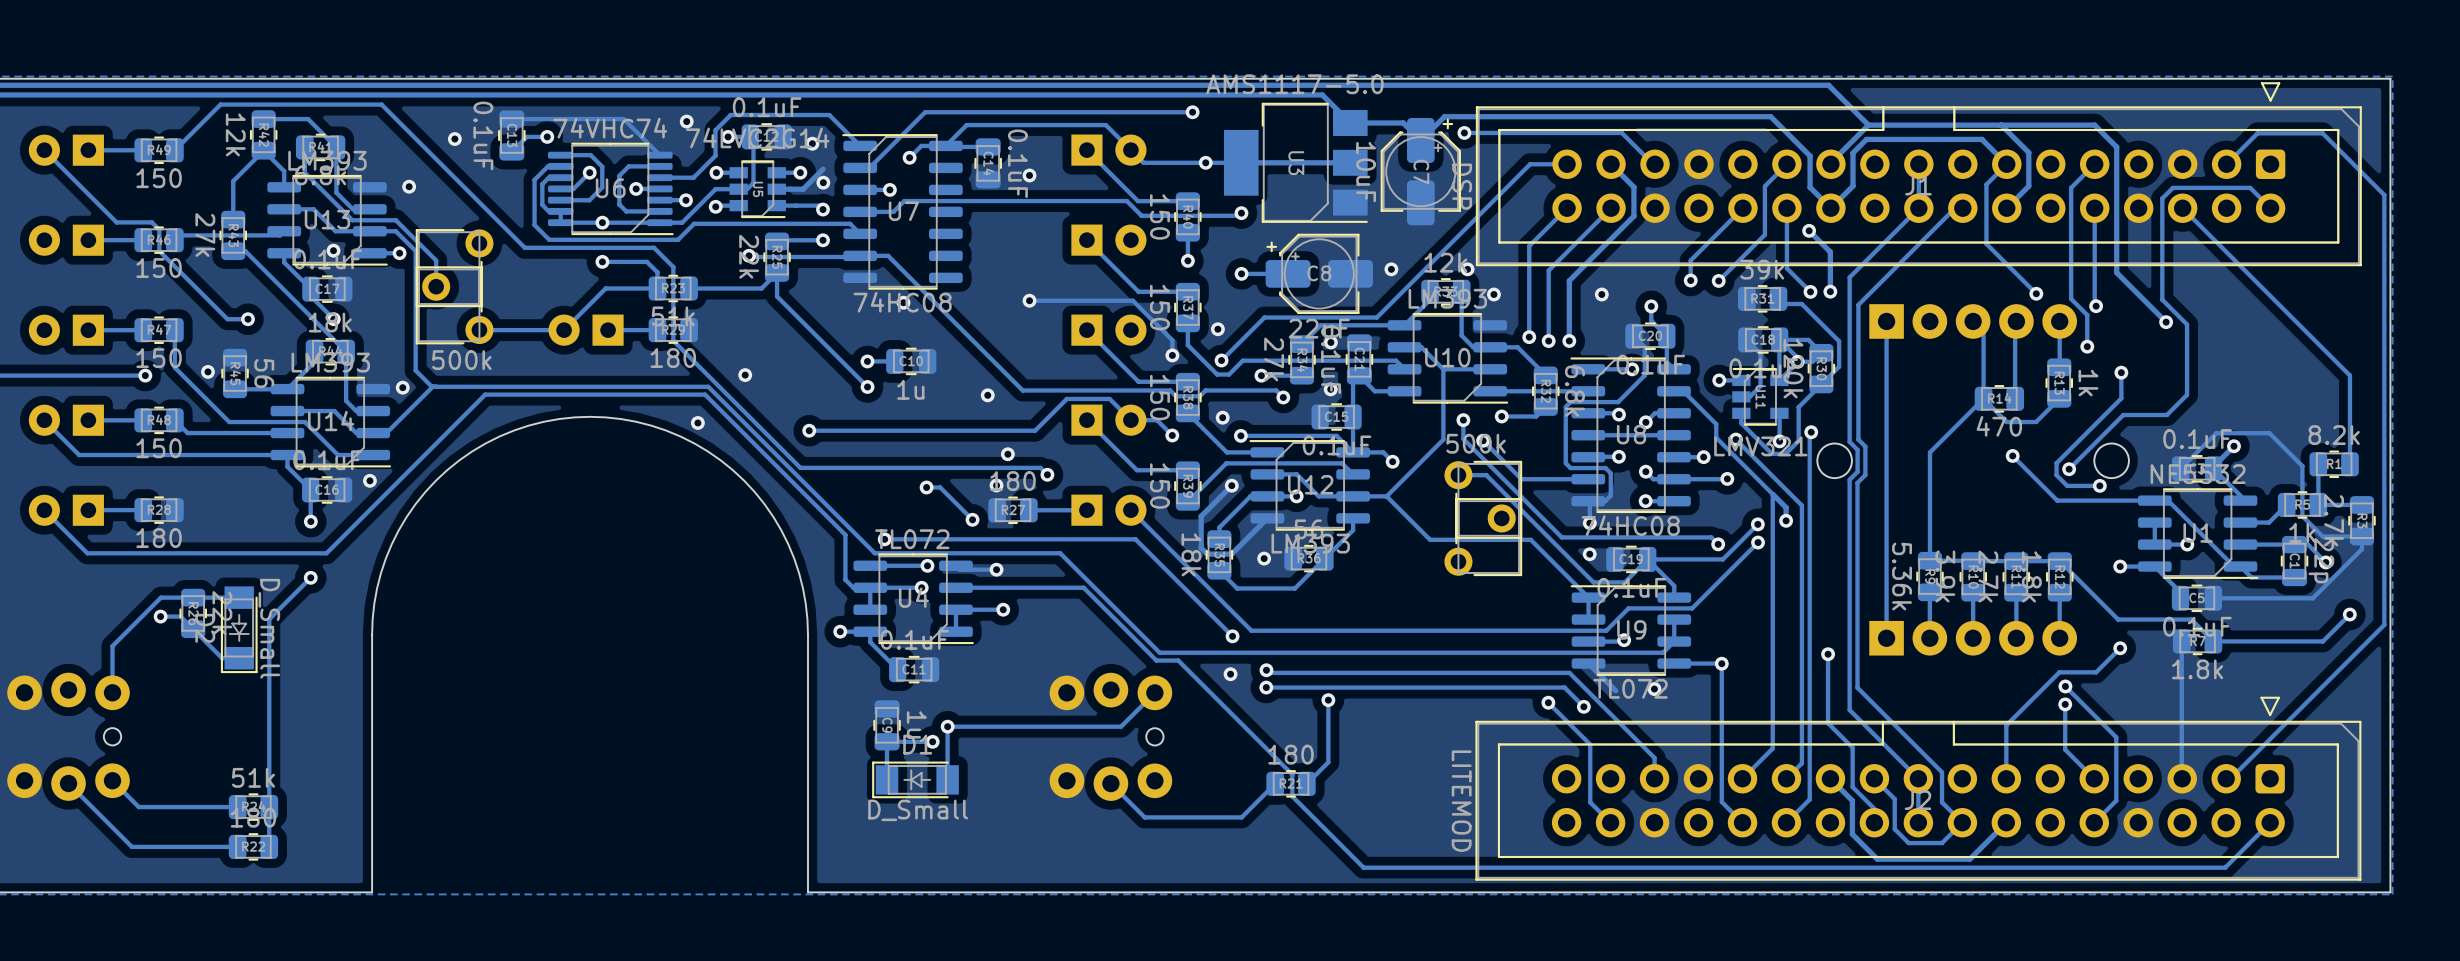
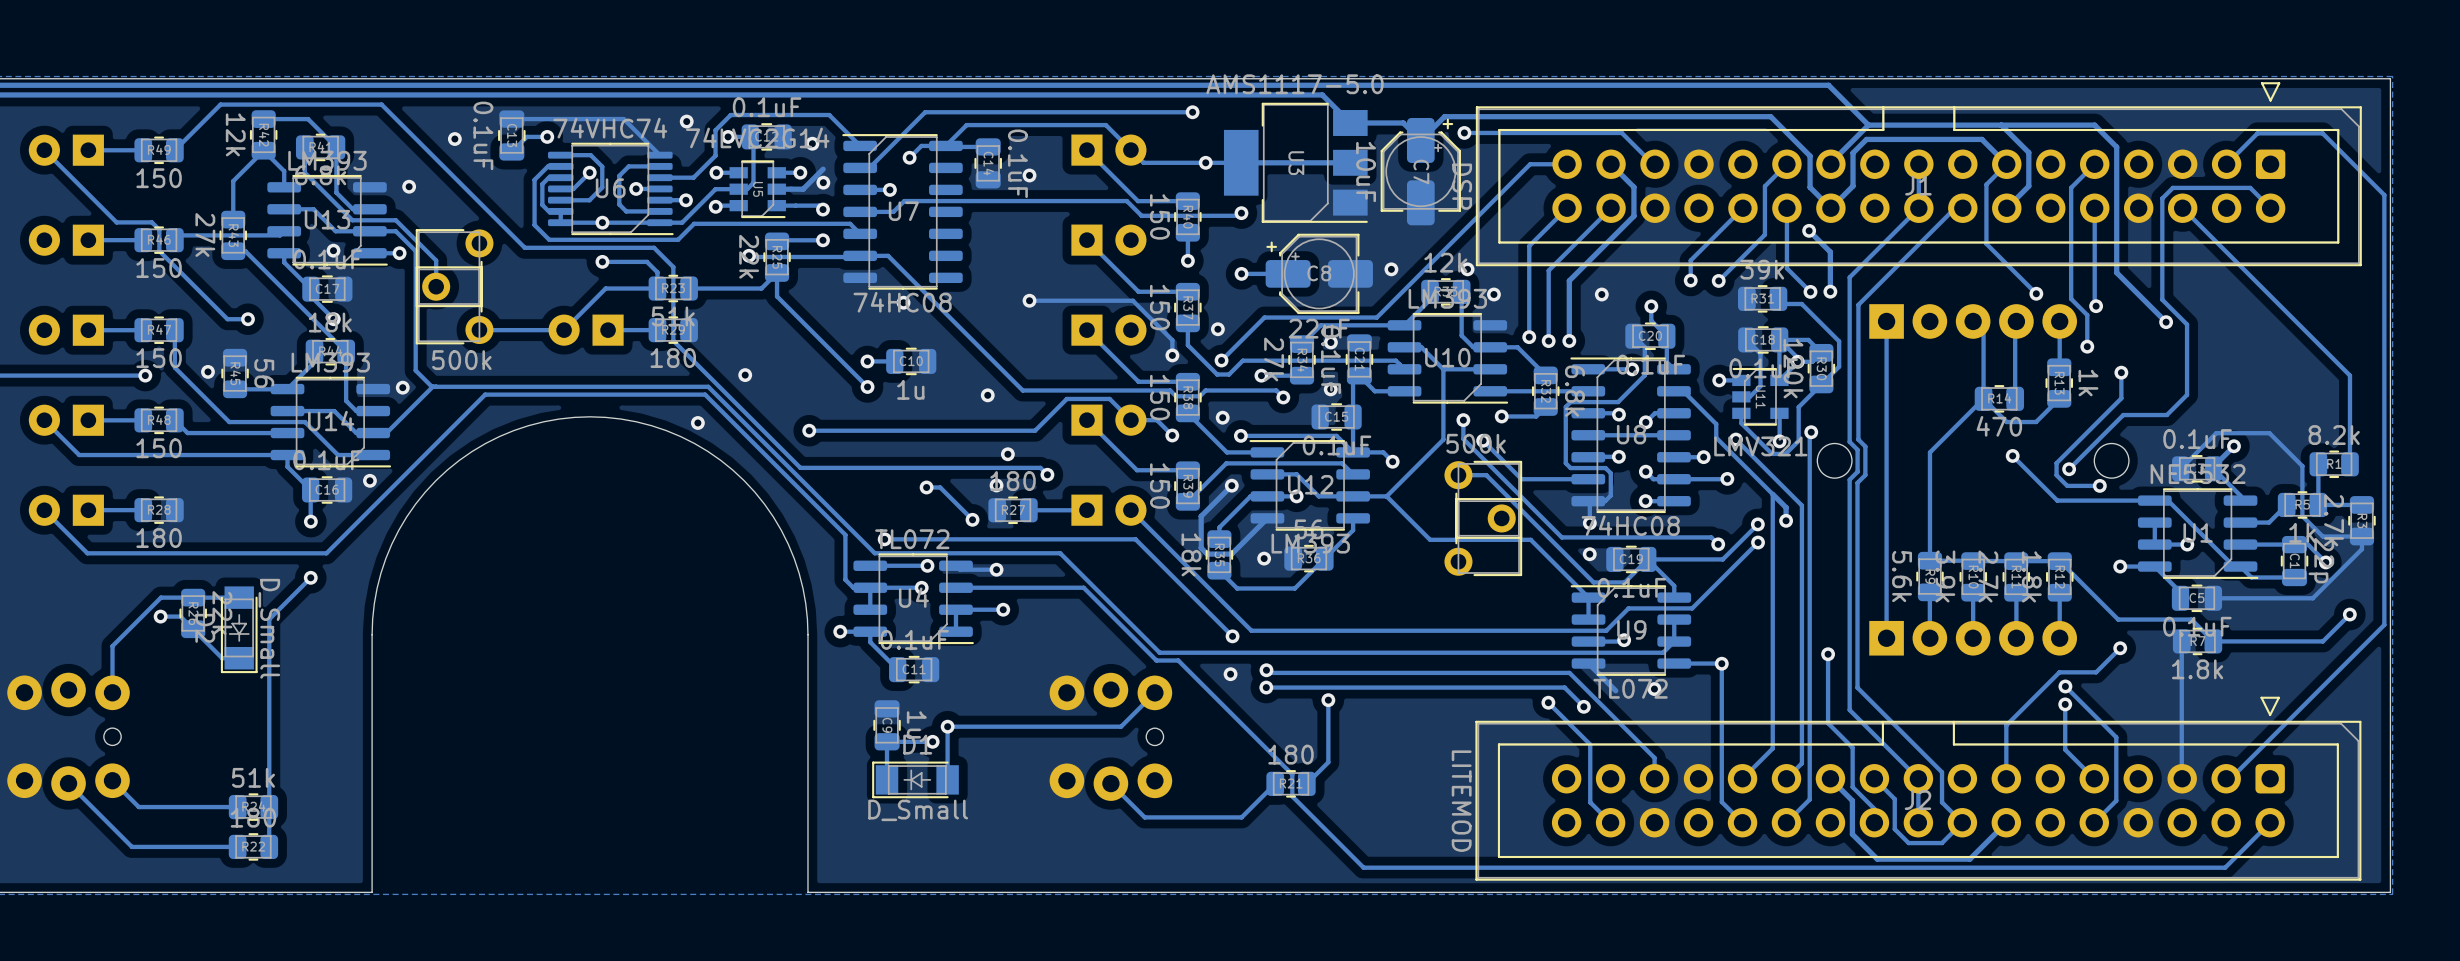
R9 value: 5.36k (1902, 576) -> 5.6k (1902, 576)

